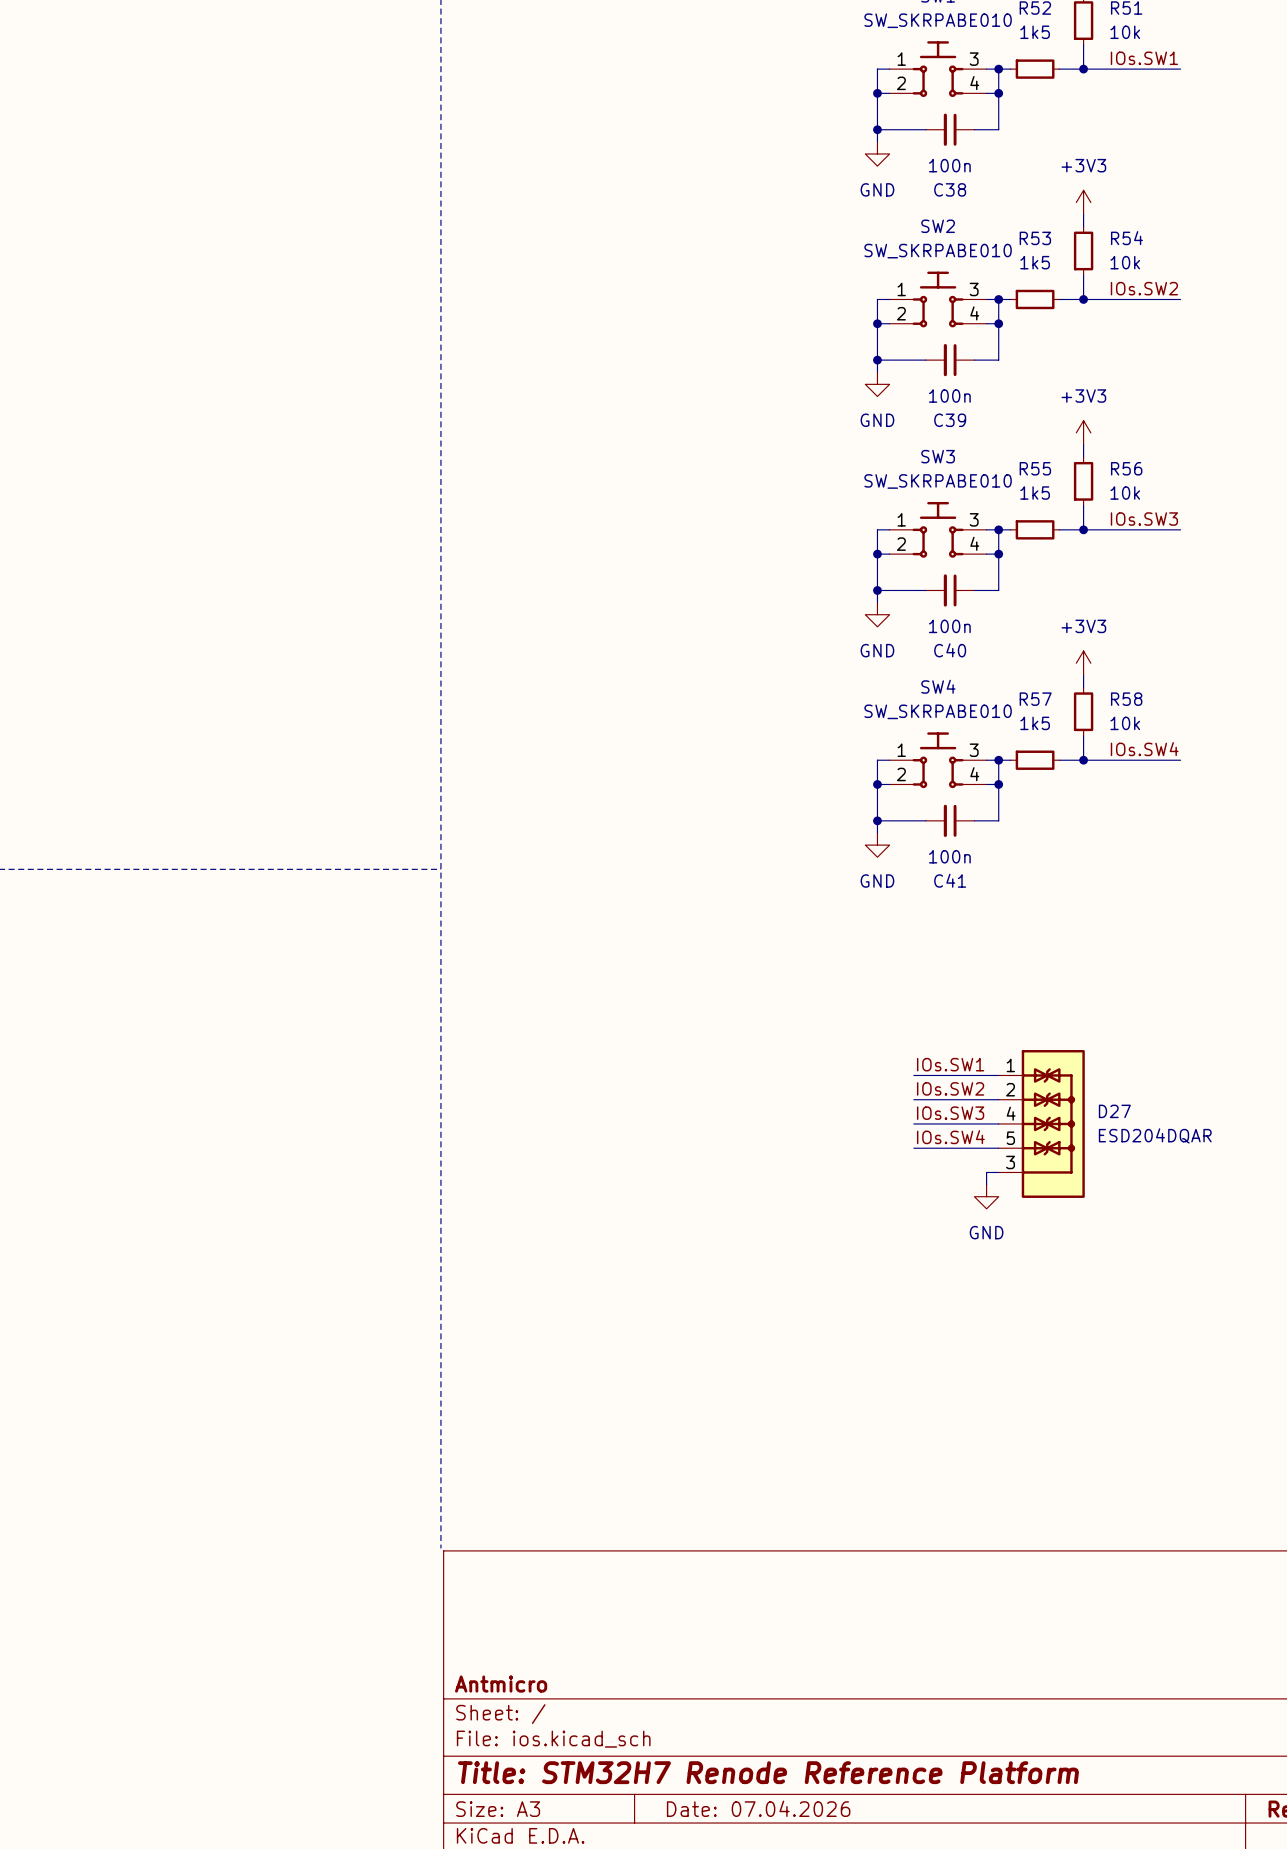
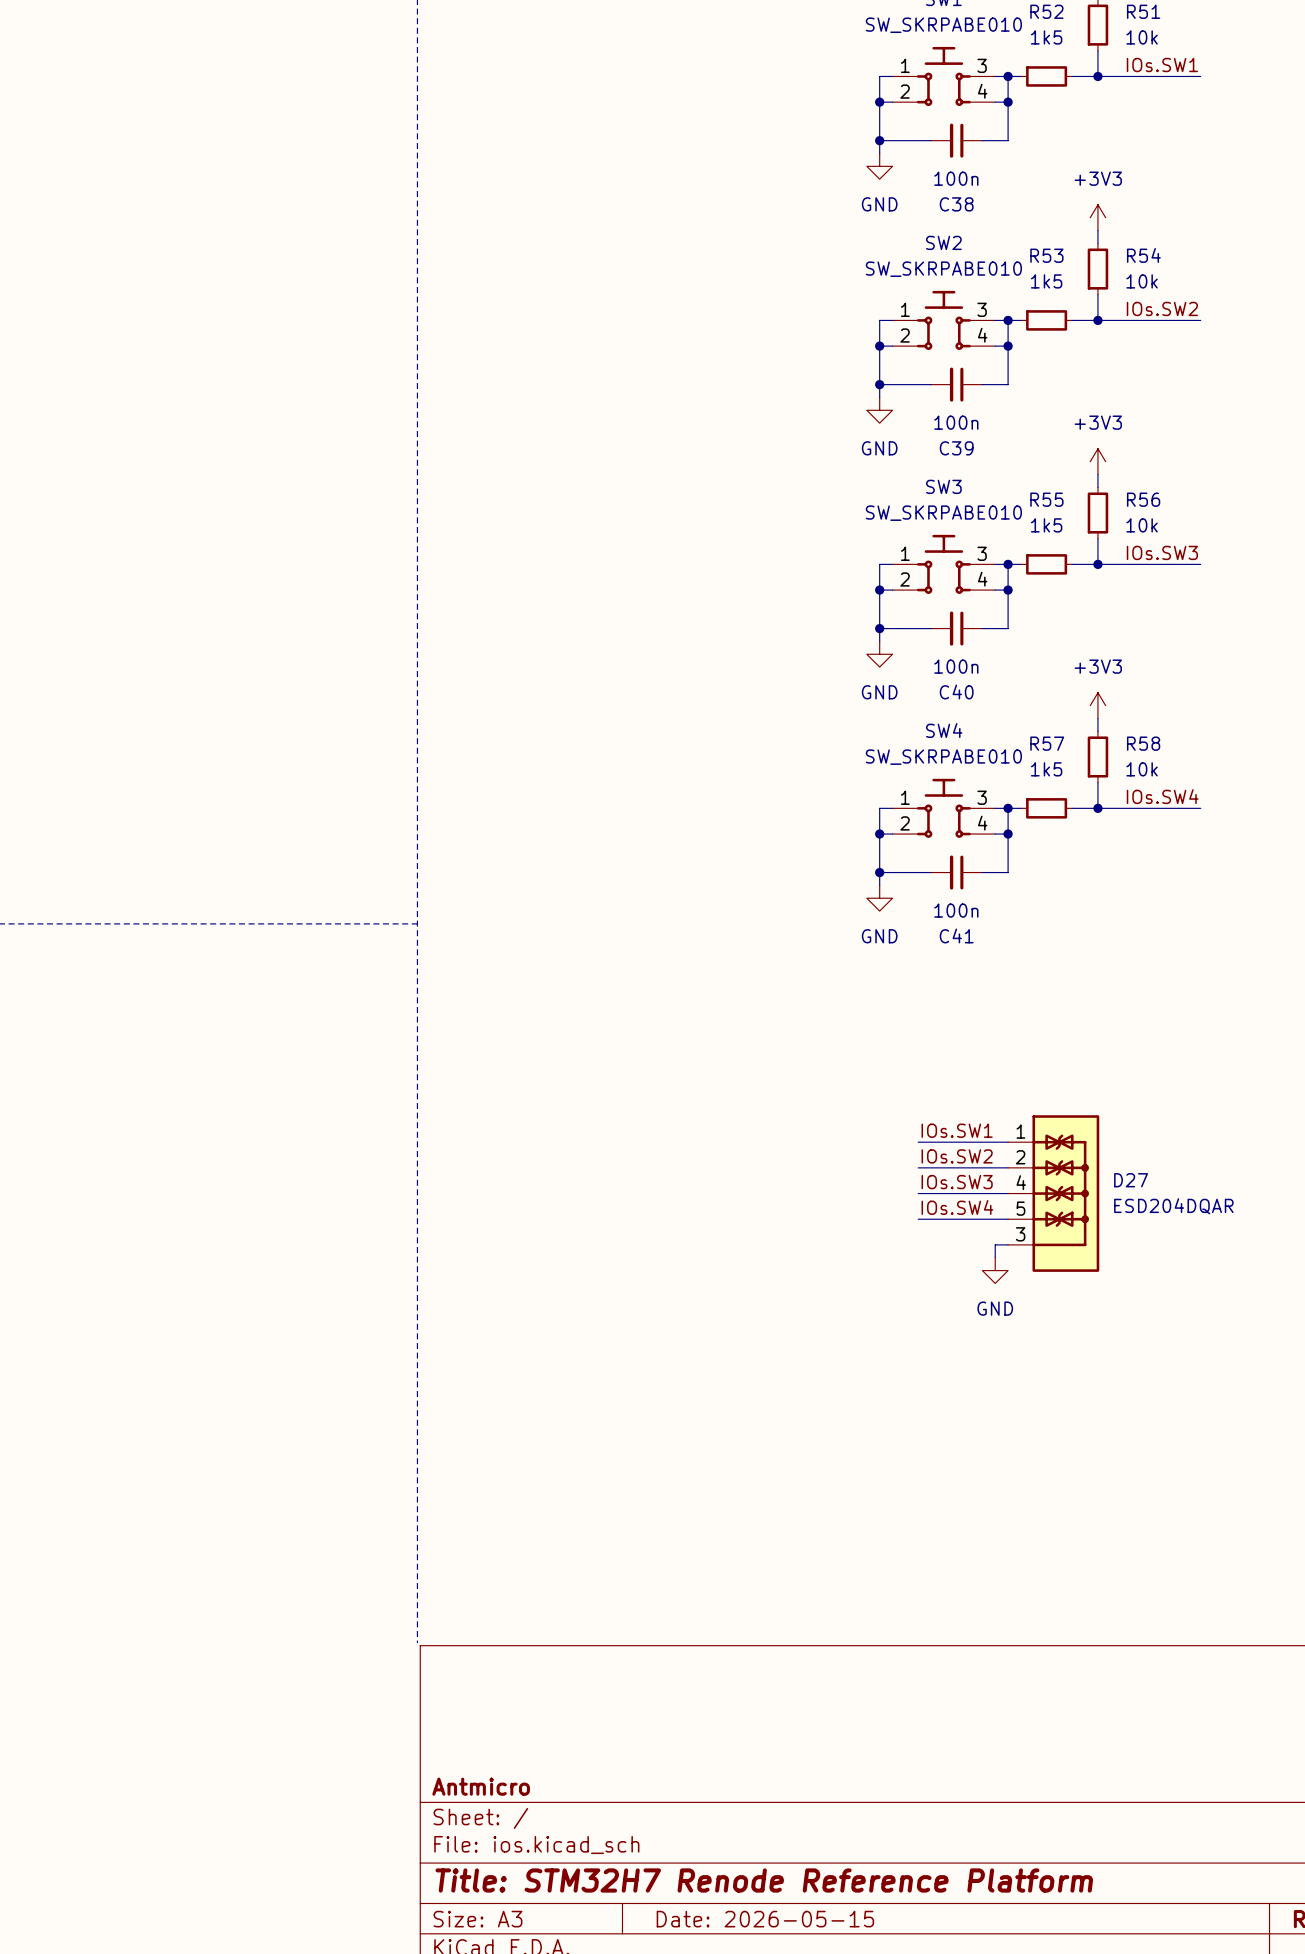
title block: Date: 07.04.2026 (758, 1808) -> Date: 2026-05-15 (765, 1919)

